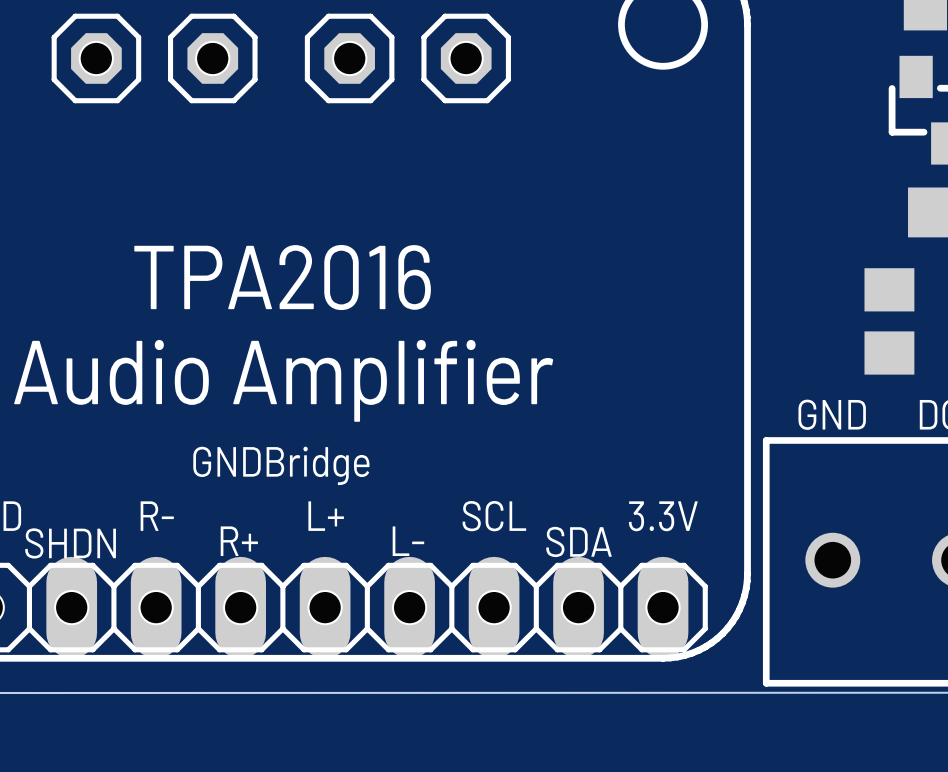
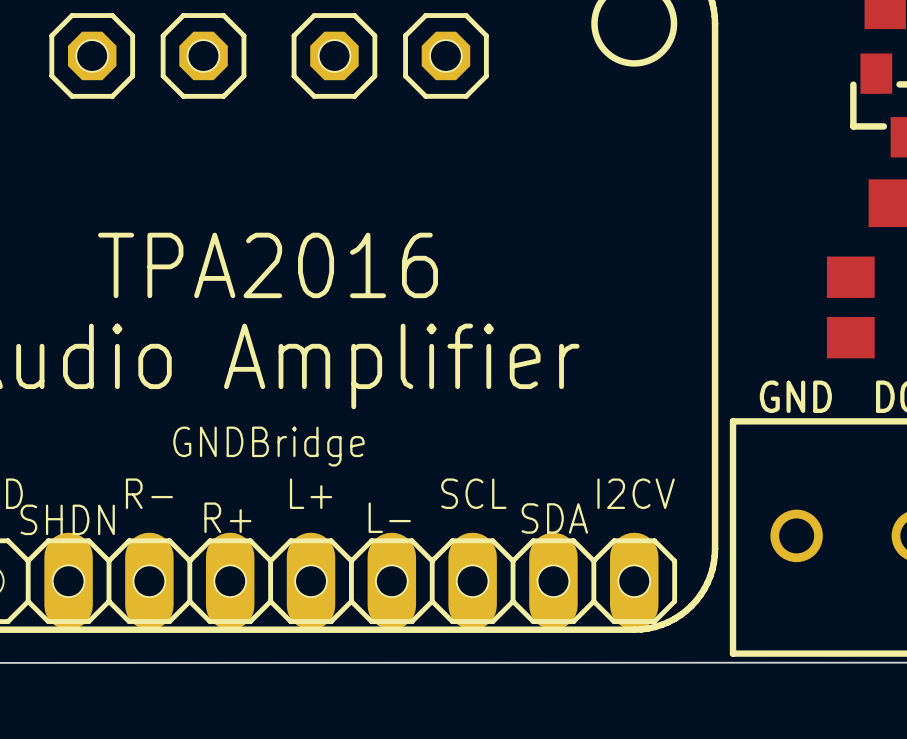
text: 3.3V (663, 516) -> I2CV (636, 493)

